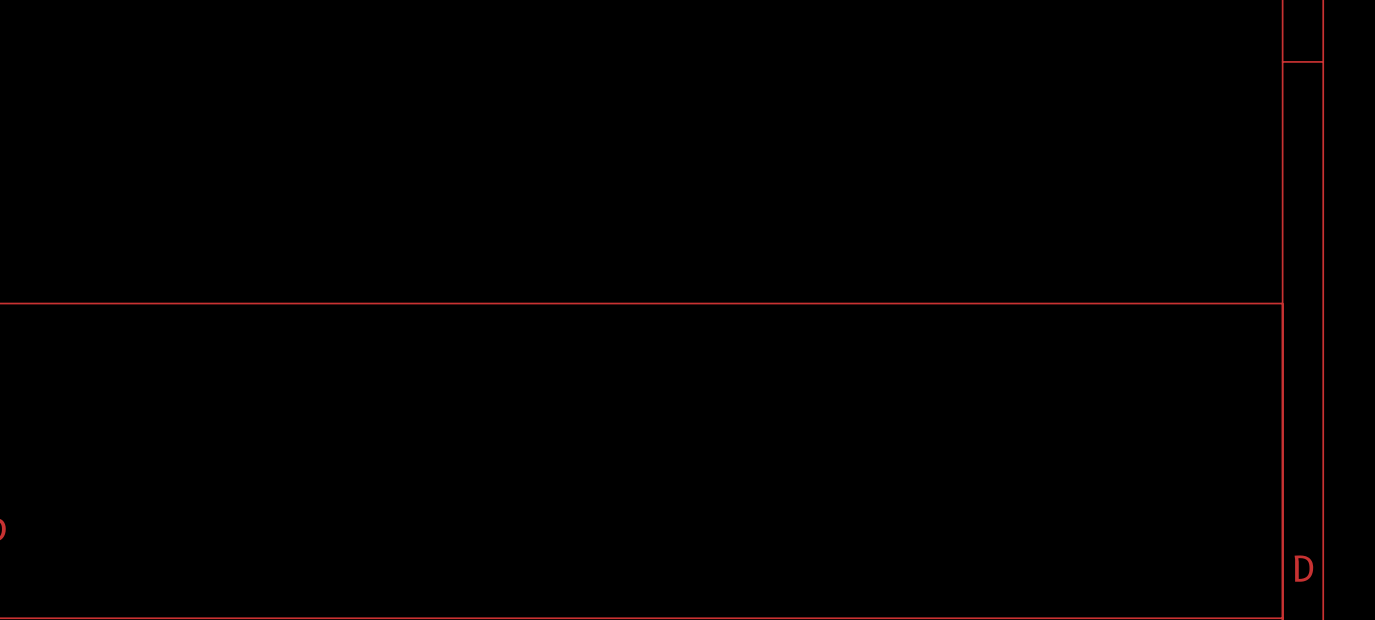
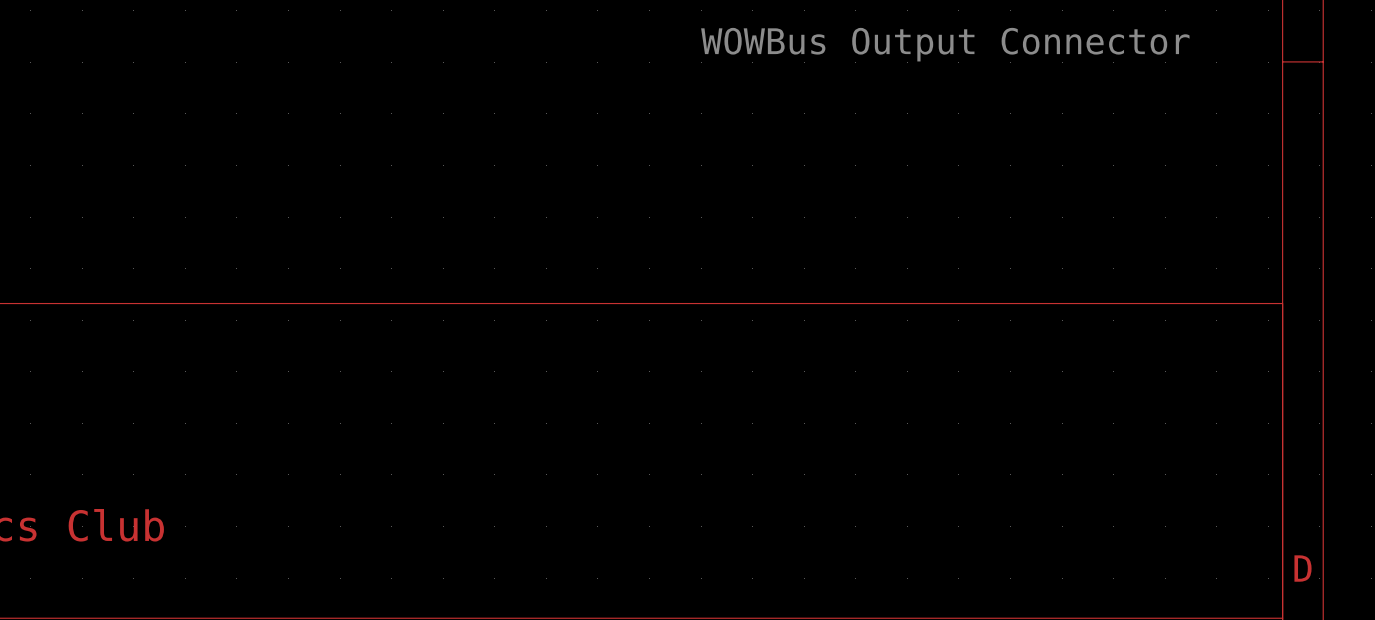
text: none -> WOWBus Output Connector (945, 44)

